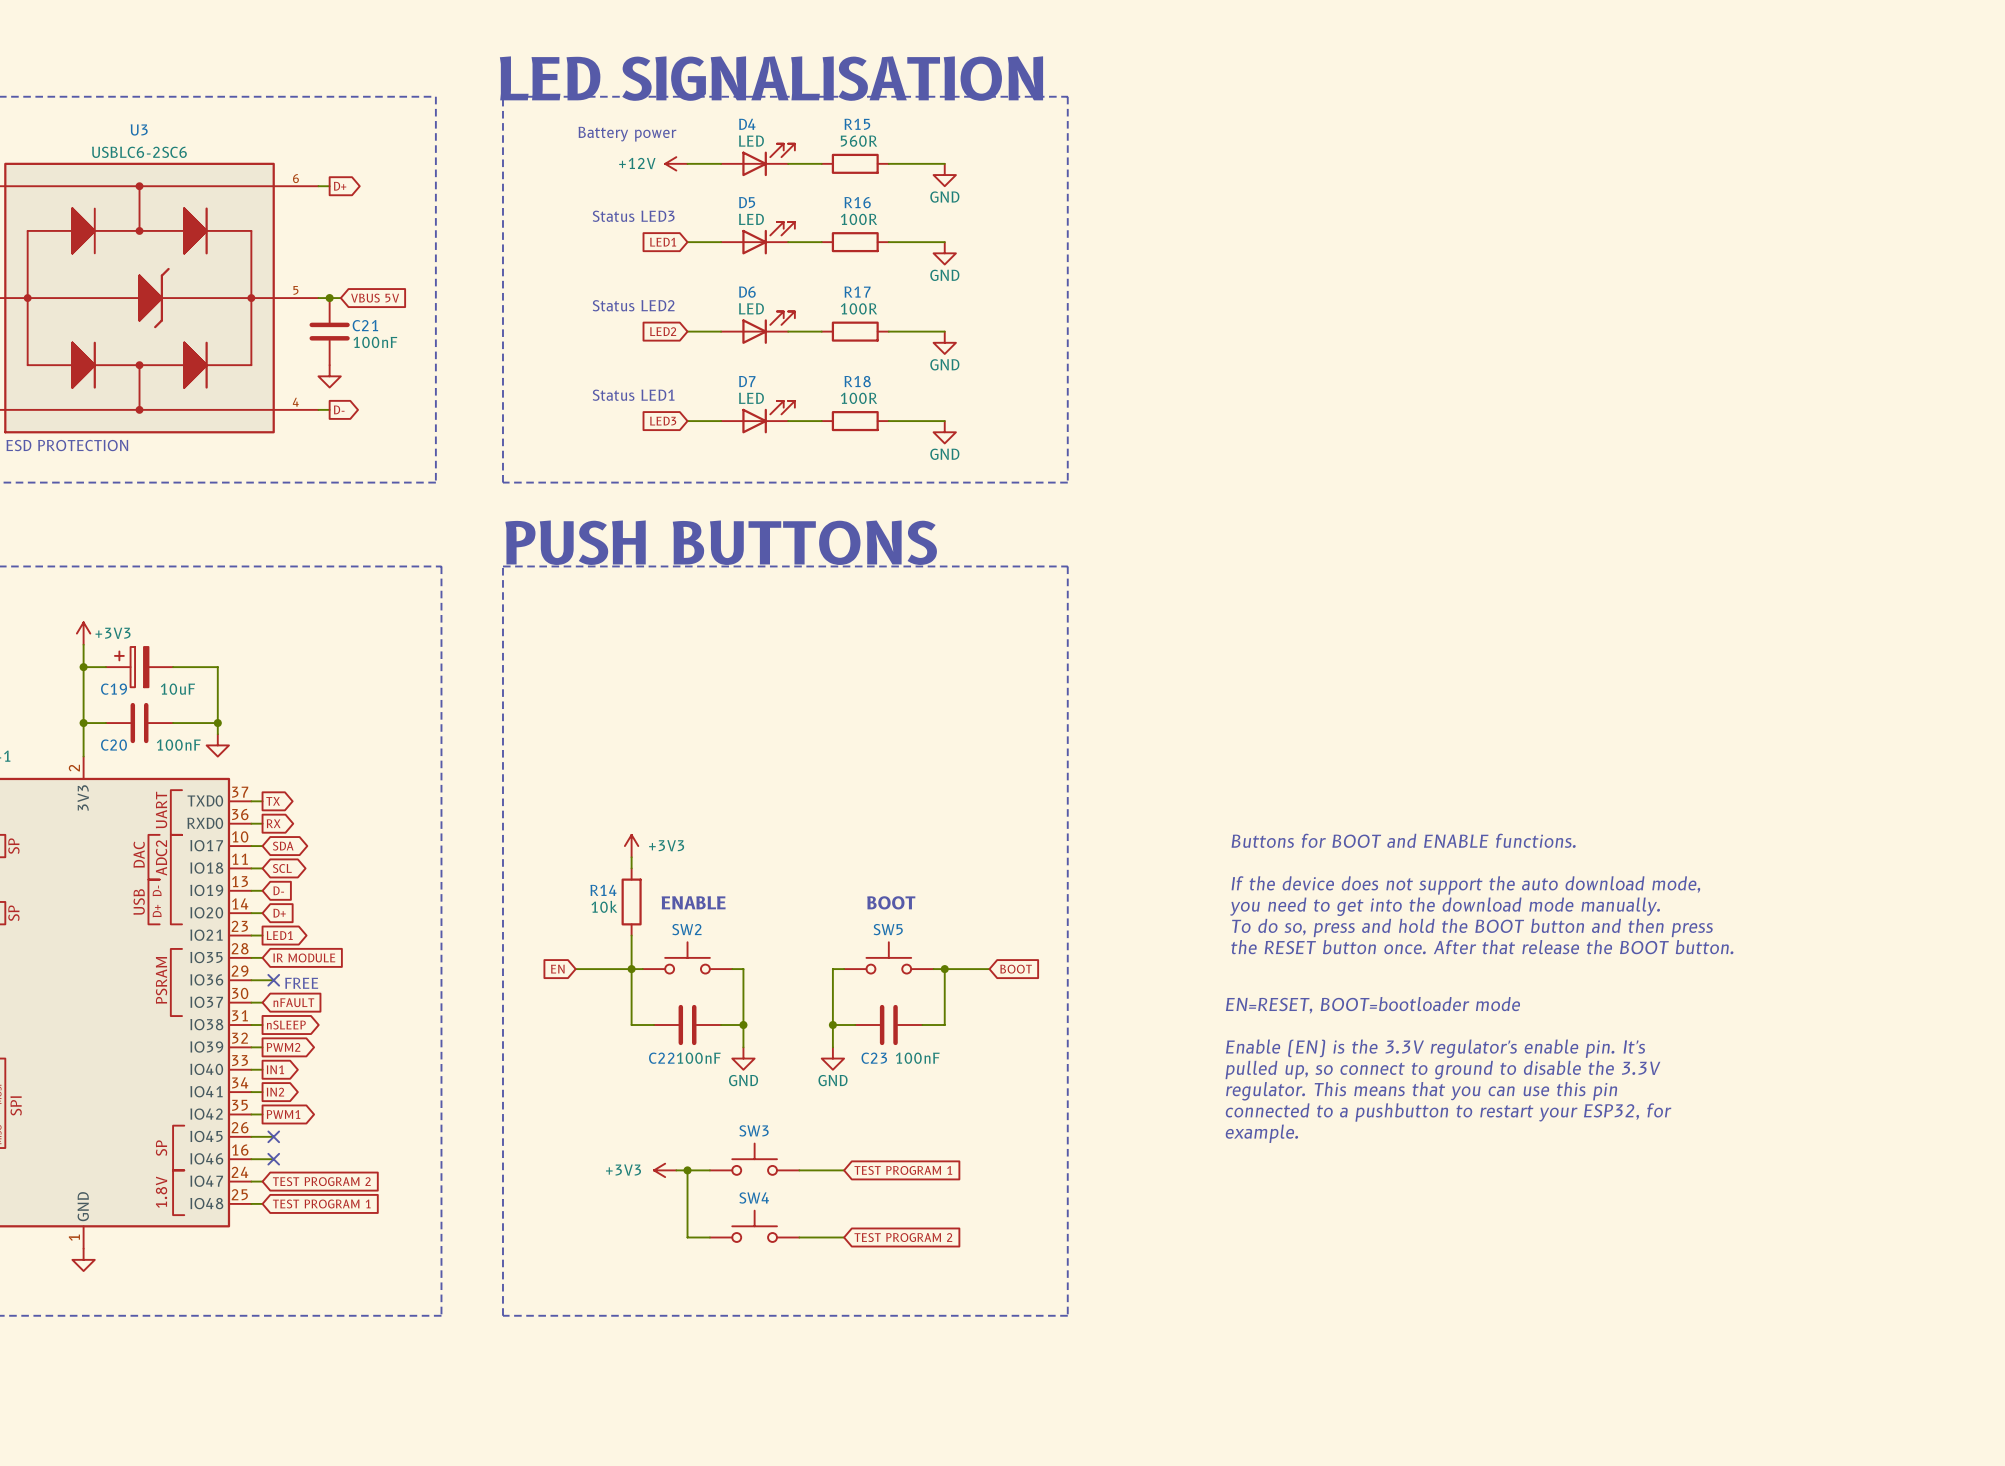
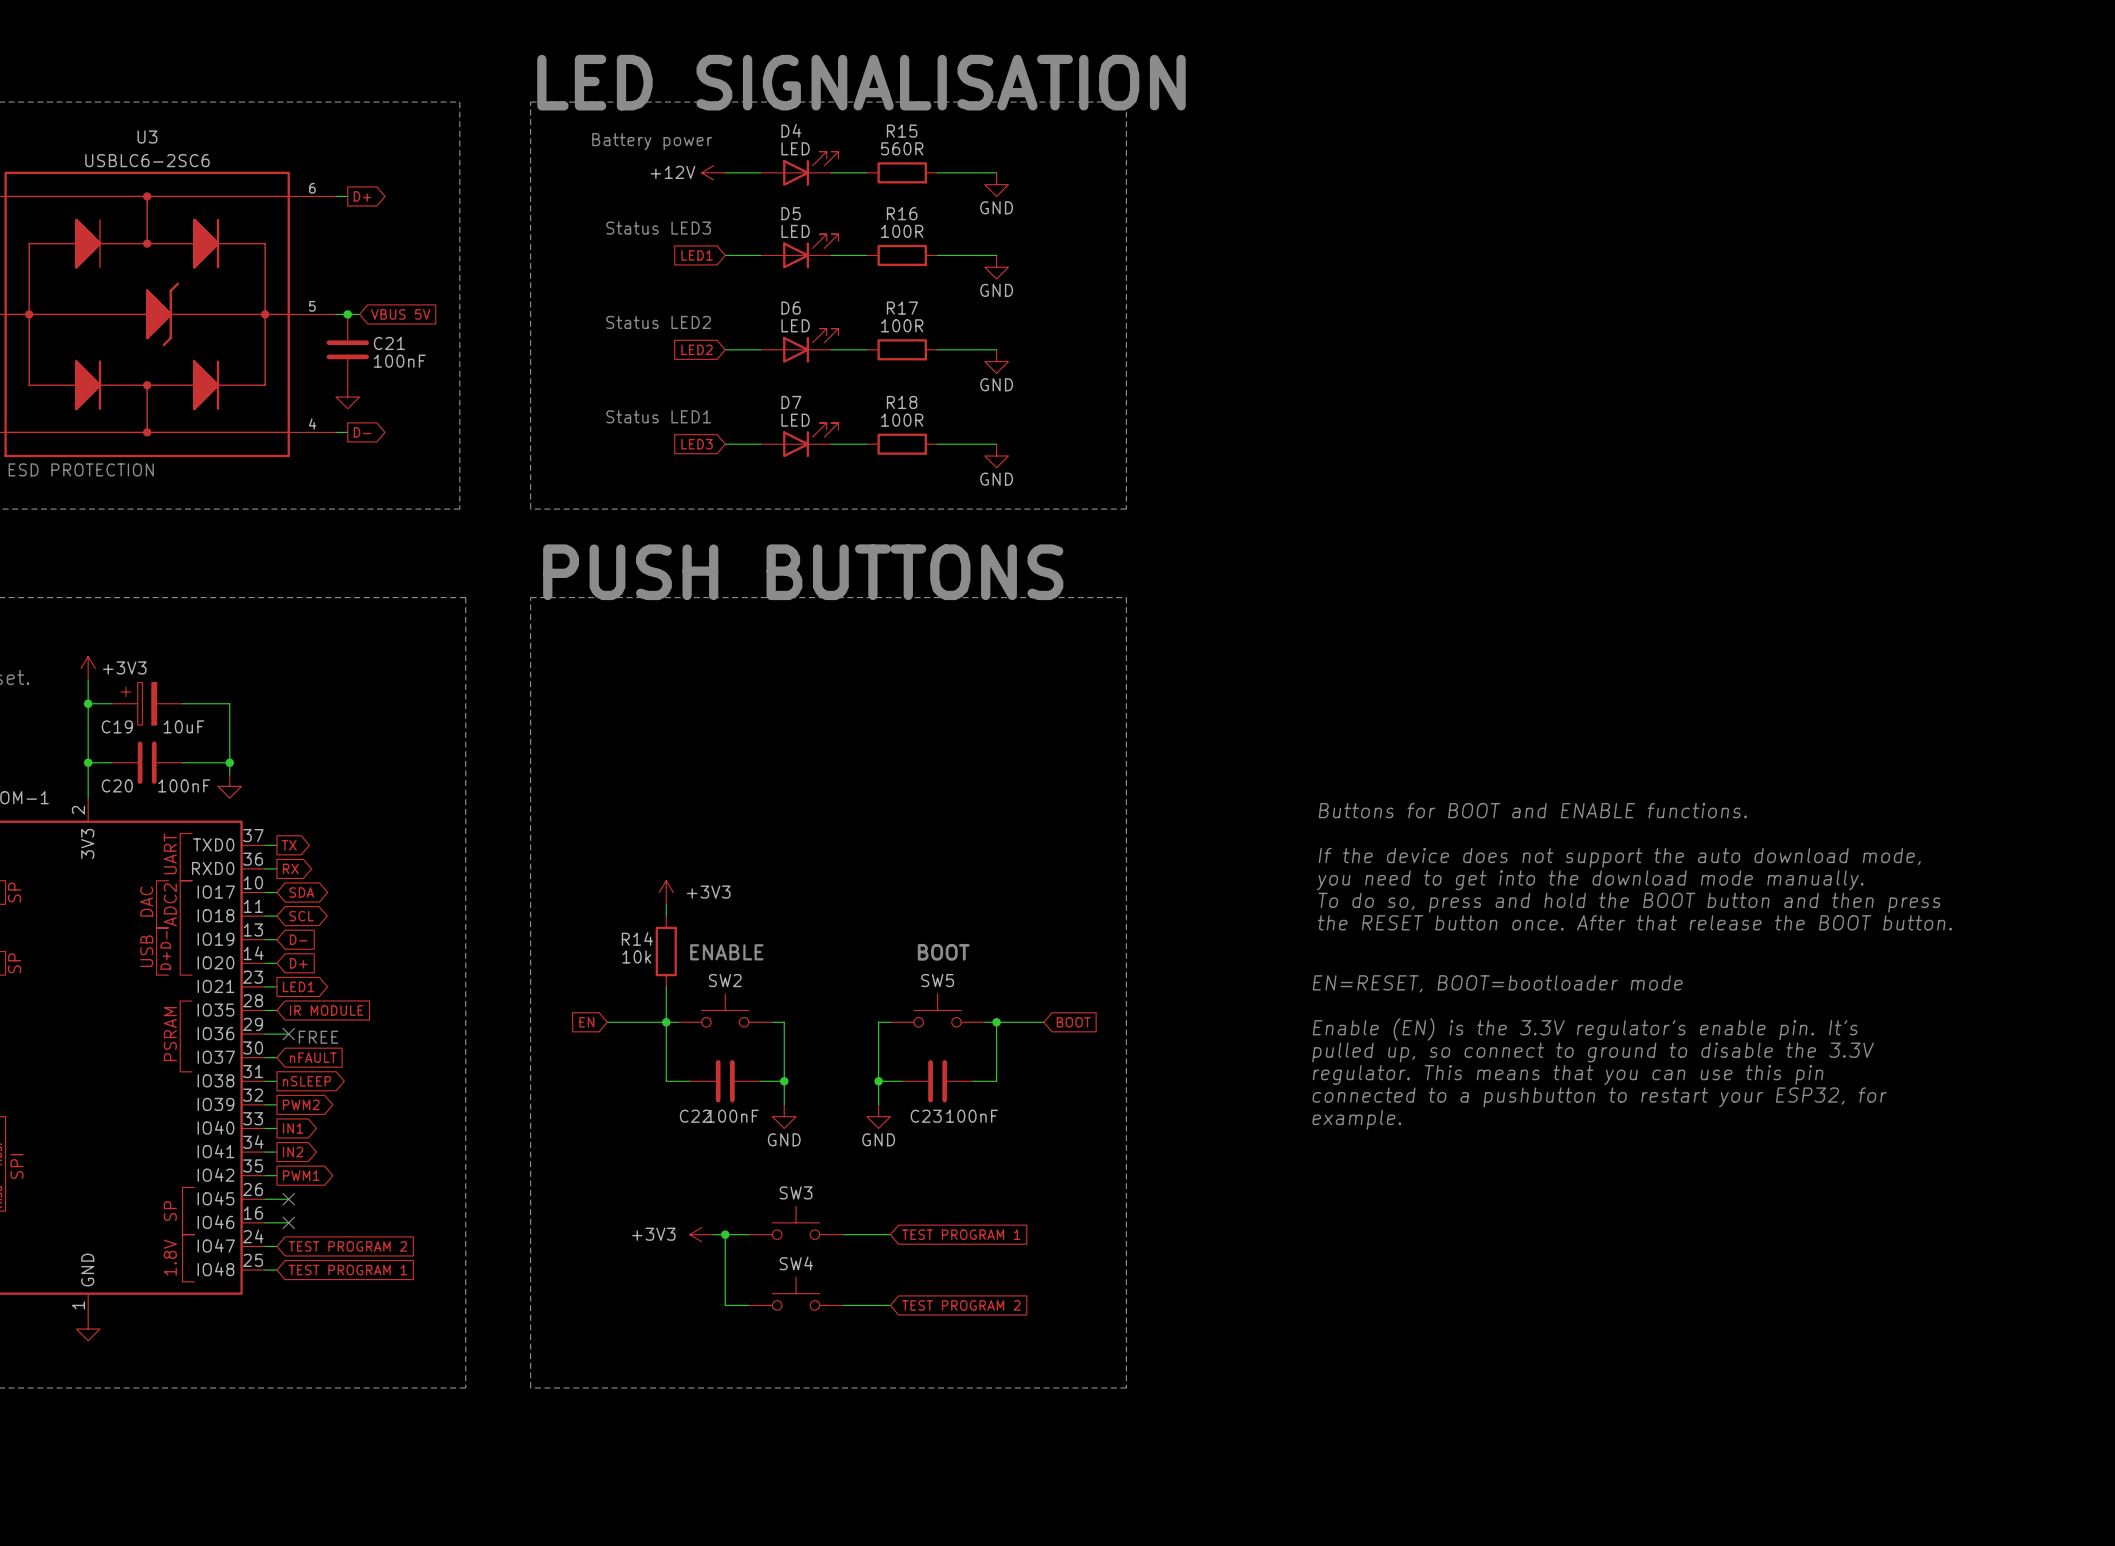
text position: Buttons for BOOT and ENABLE functions. (1403, 840) -> Buttons for BOOT and ENABLE functions. (1532, 810)
text position: If the device does not support the auto download mode, (1465, 885) -> If the device does not support the auto download mode, (1619, 857)
text position: you need to get into the download mode manually. (1445, 906) -> you need to get into the download mode manually. (1590, 880)
text position: To do so, press and hold the BOOT button and then press (1472, 927) -> To do so, press and hold the BOOT button and then press (1629, 902)
text position: the RESET button once. After that release the BOOT button. (1482, 947) -> the RESET button once. After that release the BOOT button. (1634, 922)
text position: EN=RESET, BOOT=bootloader mode (1372, 1005) -> EN=RESET, BOOT=bootloader mode (1497, 983)
text position: Enable (EN) is the 3.3V regulator's enable pin. It's (1435, 1048) -> Enable (EN) is the 3.3V regulator's enable pin. It's (1585, 1029)
text position: pulled up, so connect to ground to disable the 3.3V (1442, 1070) -> pulled up, so connect to ground to disable the 3.3V (1593, 1052)
text position: regulator. This means that you can use this pin (1421, 1091) -> regulator. This means that you can use this pin (1568, 1074)
text position: connected to a pushbutton to restart your ESP32, for (1448, 1112) -> connected to a pushbutton to restart your ESP32, for (1599, 1097)
text position: example. (1261, 1133) -> example. (1356, 1119)

